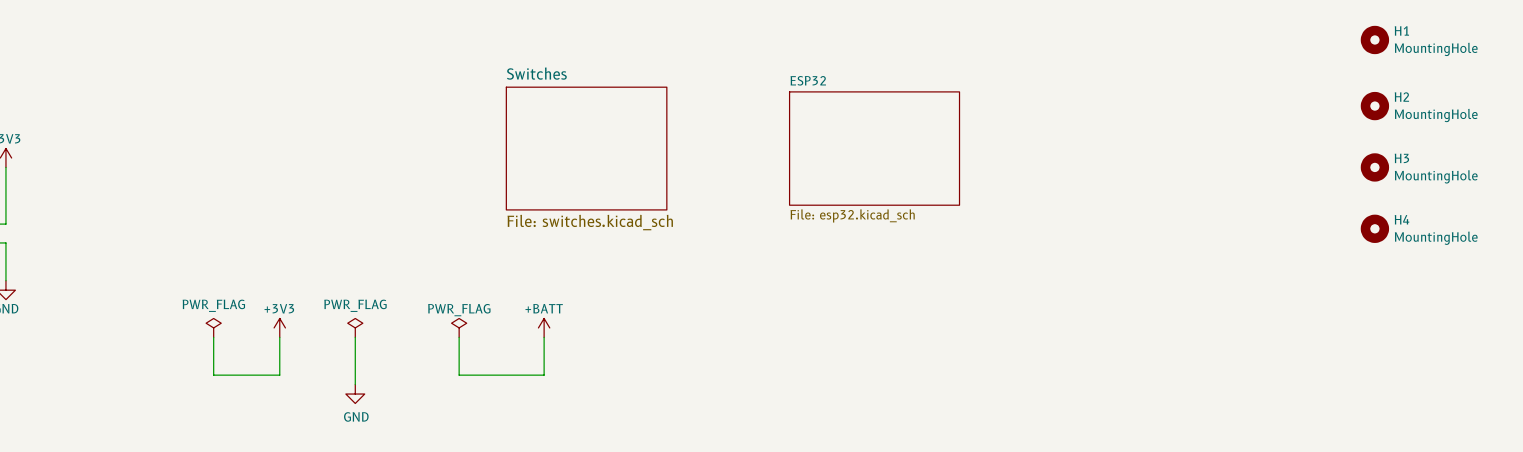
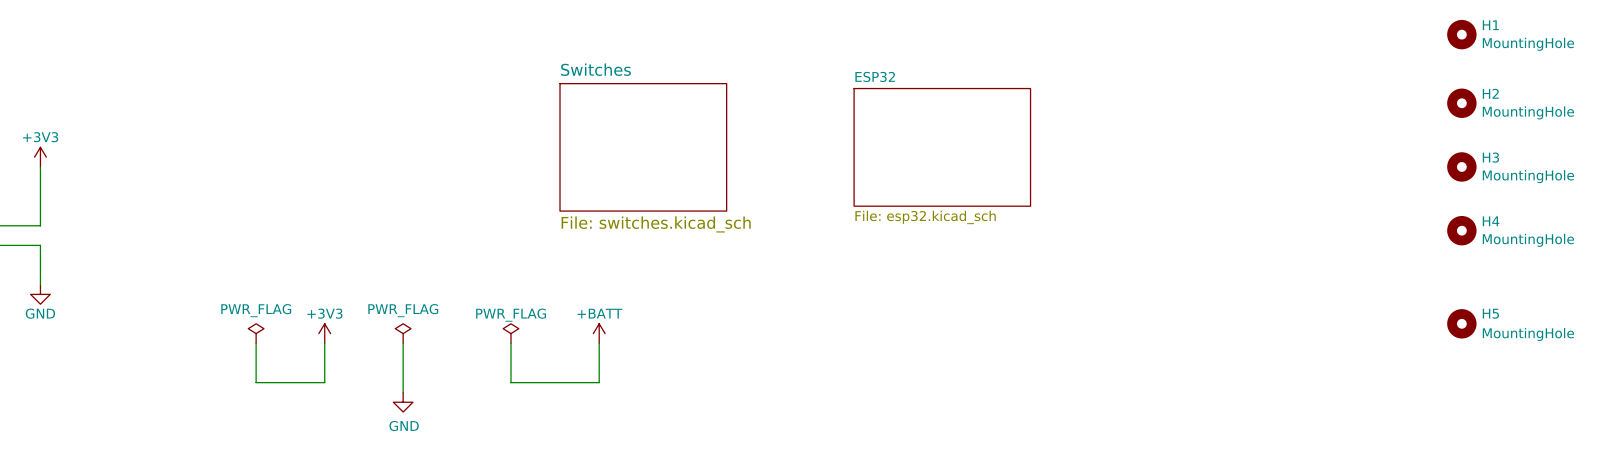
H5: none -> MountingHole (1461, 323)

